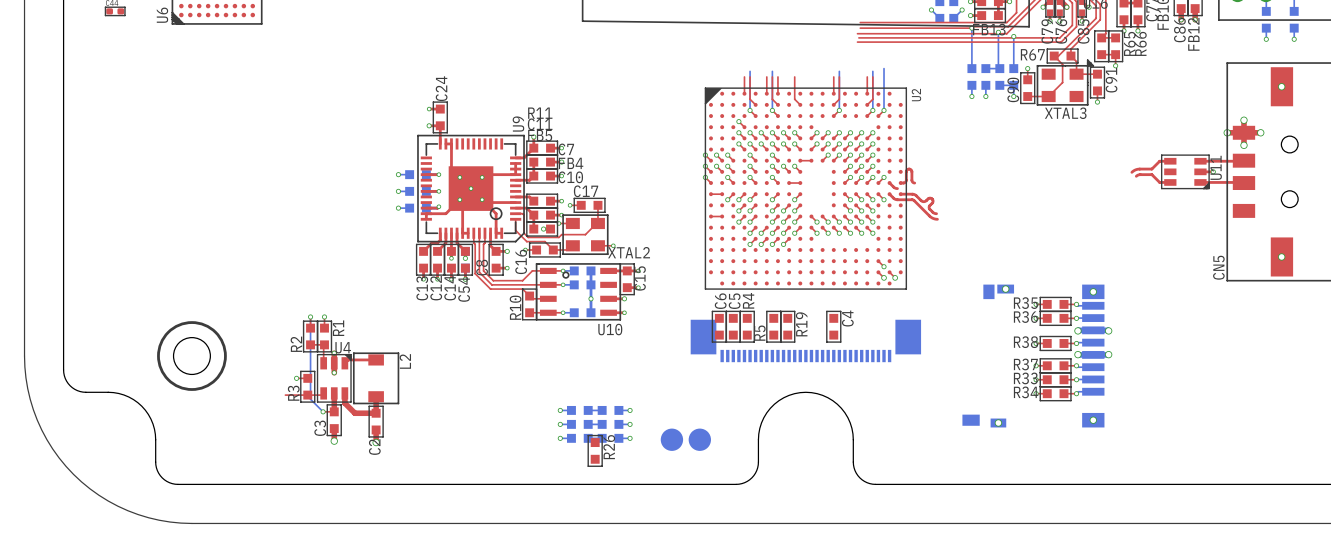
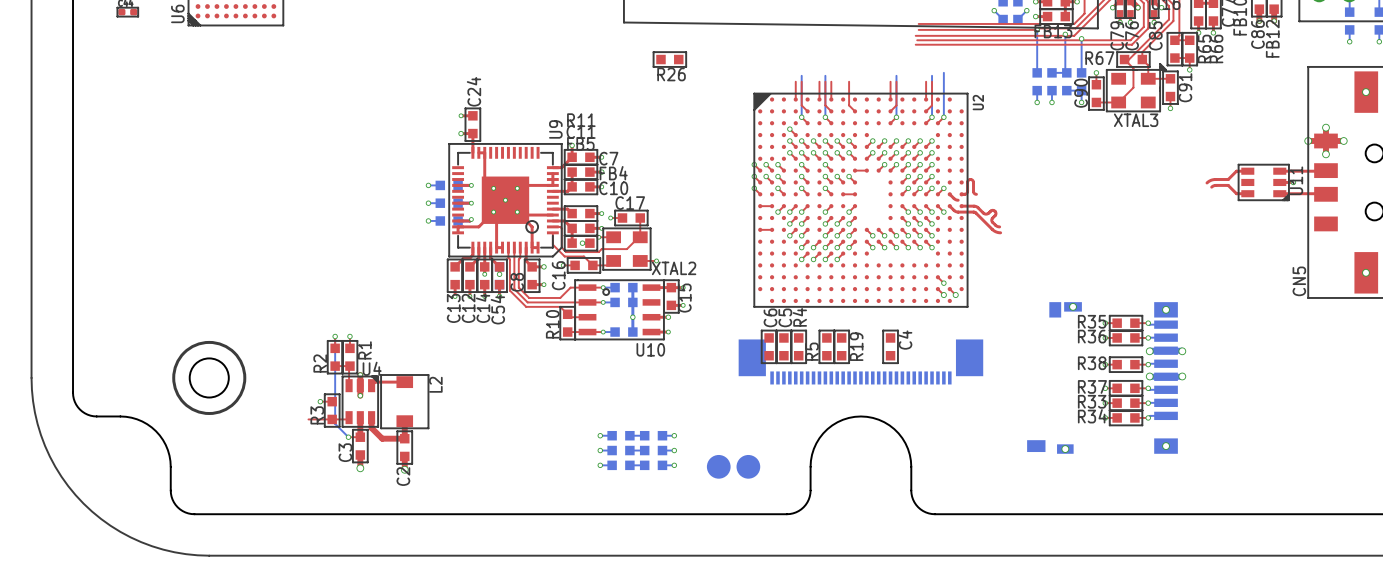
R26 rotation: 0° (595, 450) -> 90° clockwise (669, 59)
R26 position: (595, 450) -> (669, 59)

